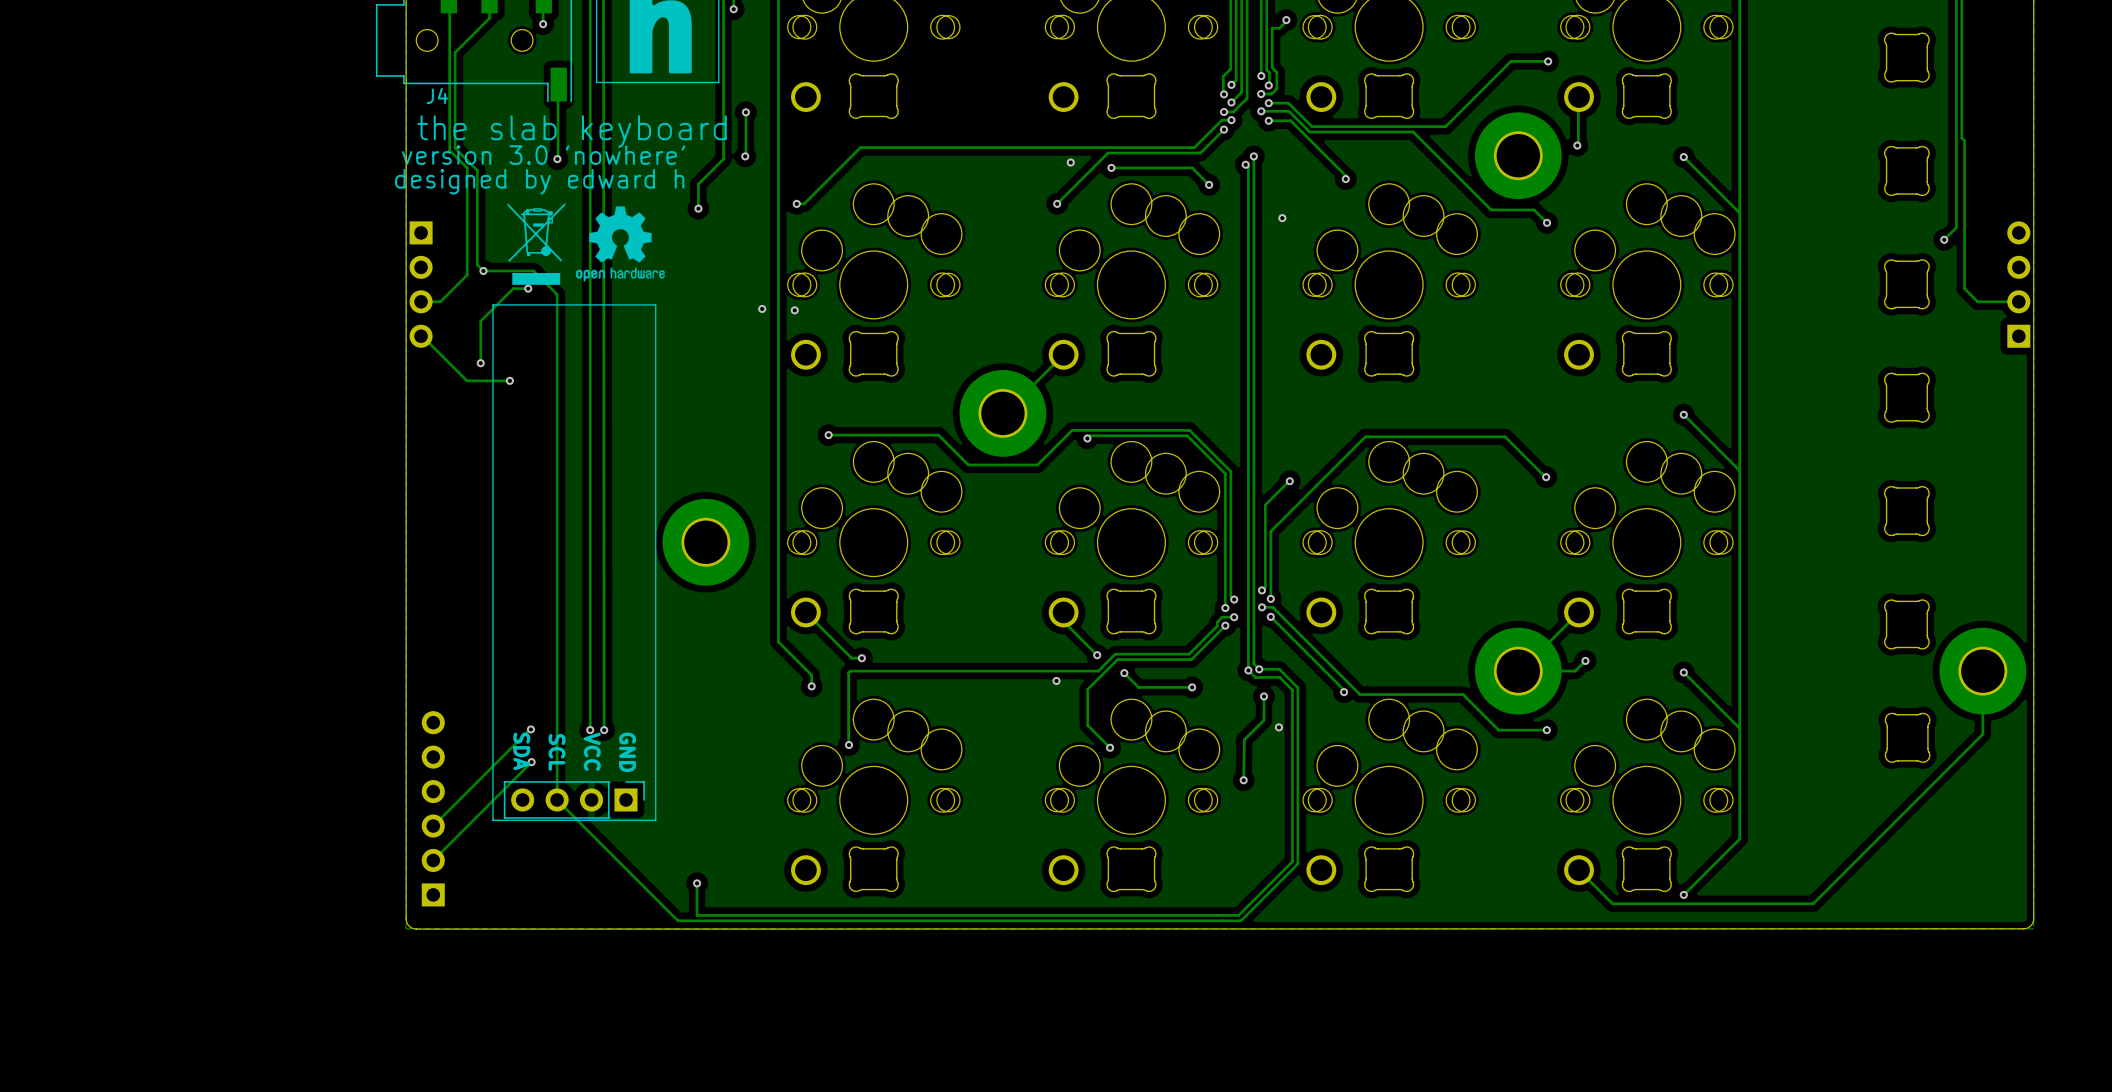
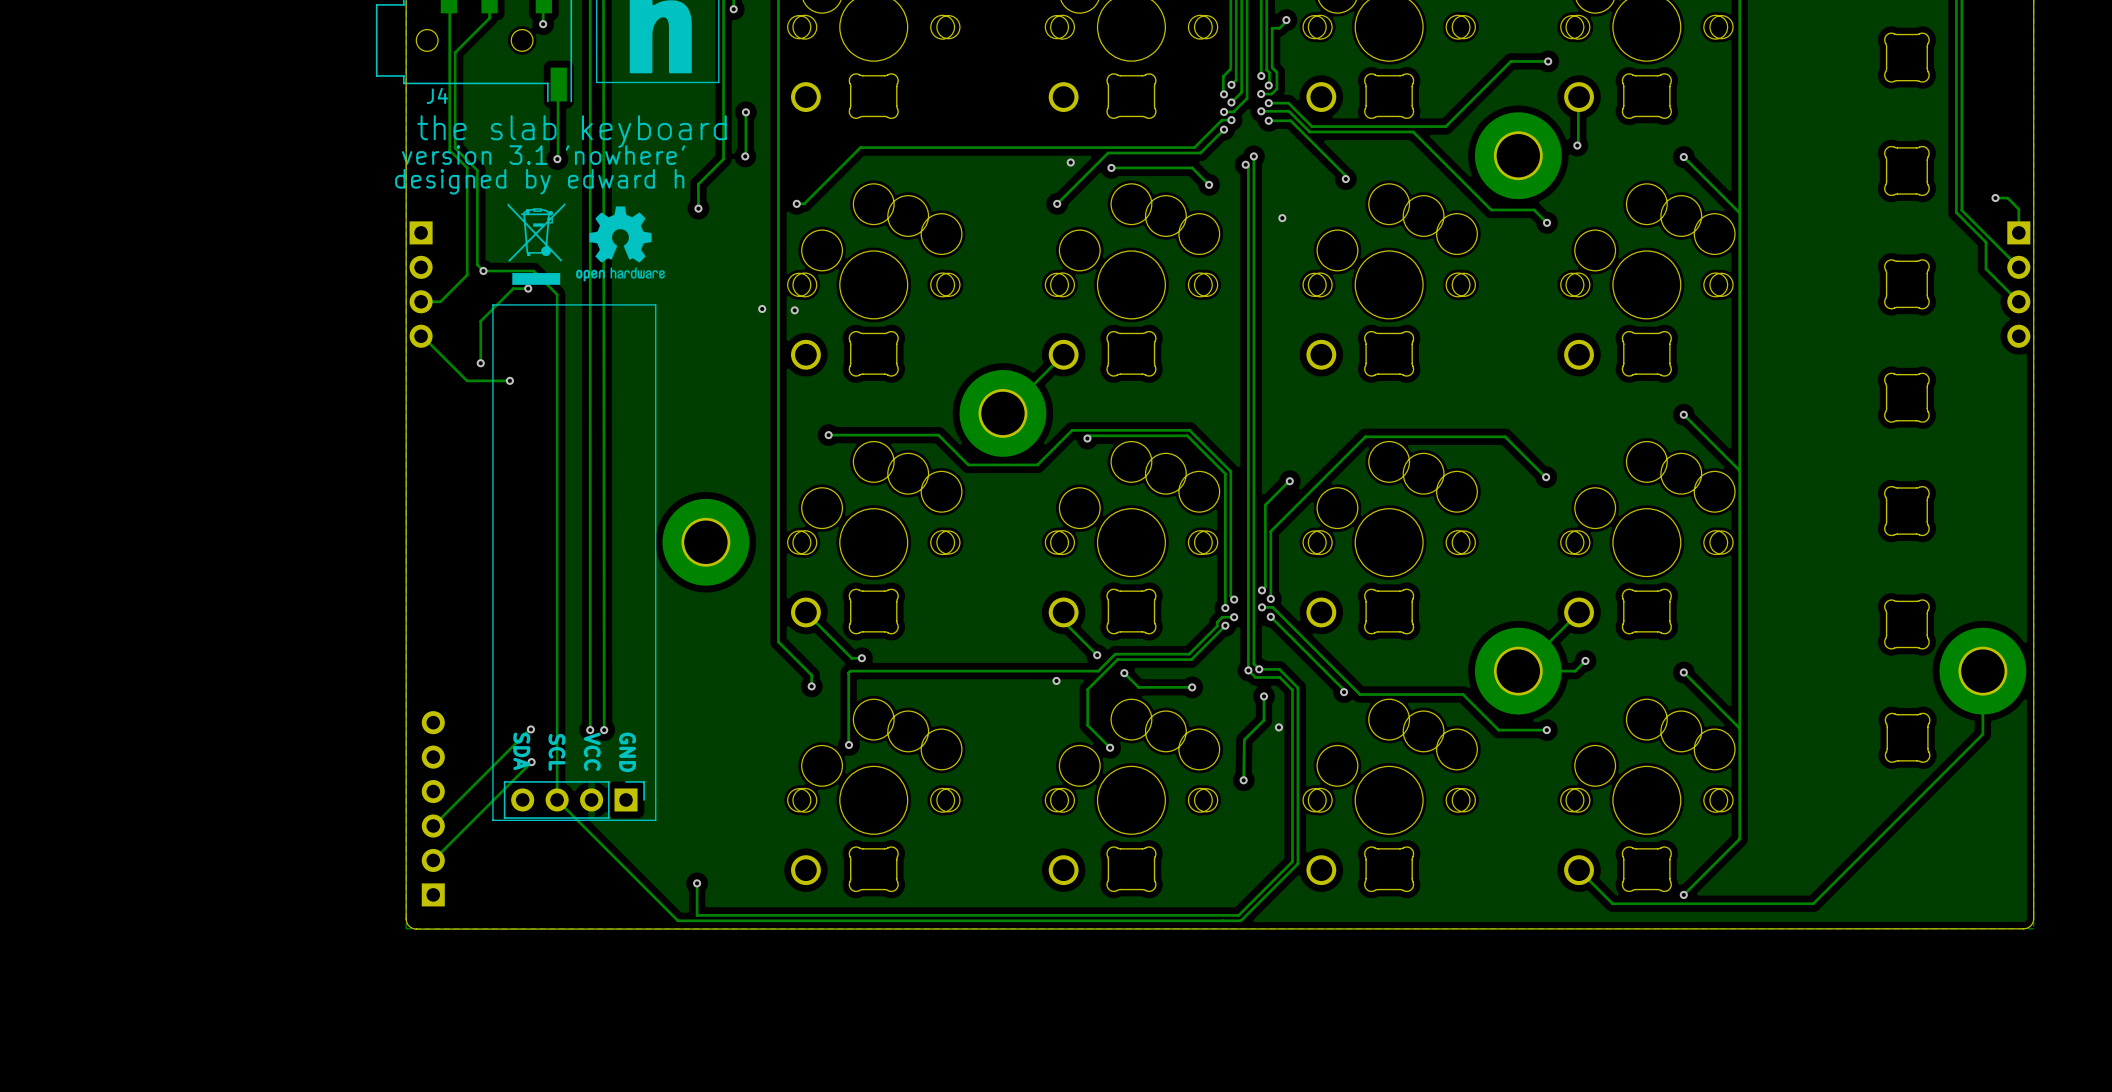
track: (1961, 138) (1964, 140) (1964, 288) (1977, 301) (2018, 301) -> (1961, 138) (1961, 210) (2018, 267)
text: version 3.0 'nowhere' (543, 155) -> version 3.1 'nowhere' (543, 155)
track: none -> (1995, 198) (2007, 198) (2018, 209) (2018, 232)
track: (1956, 212) (1956, 227) (1944, 239) -> (1956, 212) (1985, 242) (1985, 268) (2018, 301)
via position: (1944, 239) -> (1995, 198)
part rotation: 0° (2018, 284) -> 180° (2018, 284)

